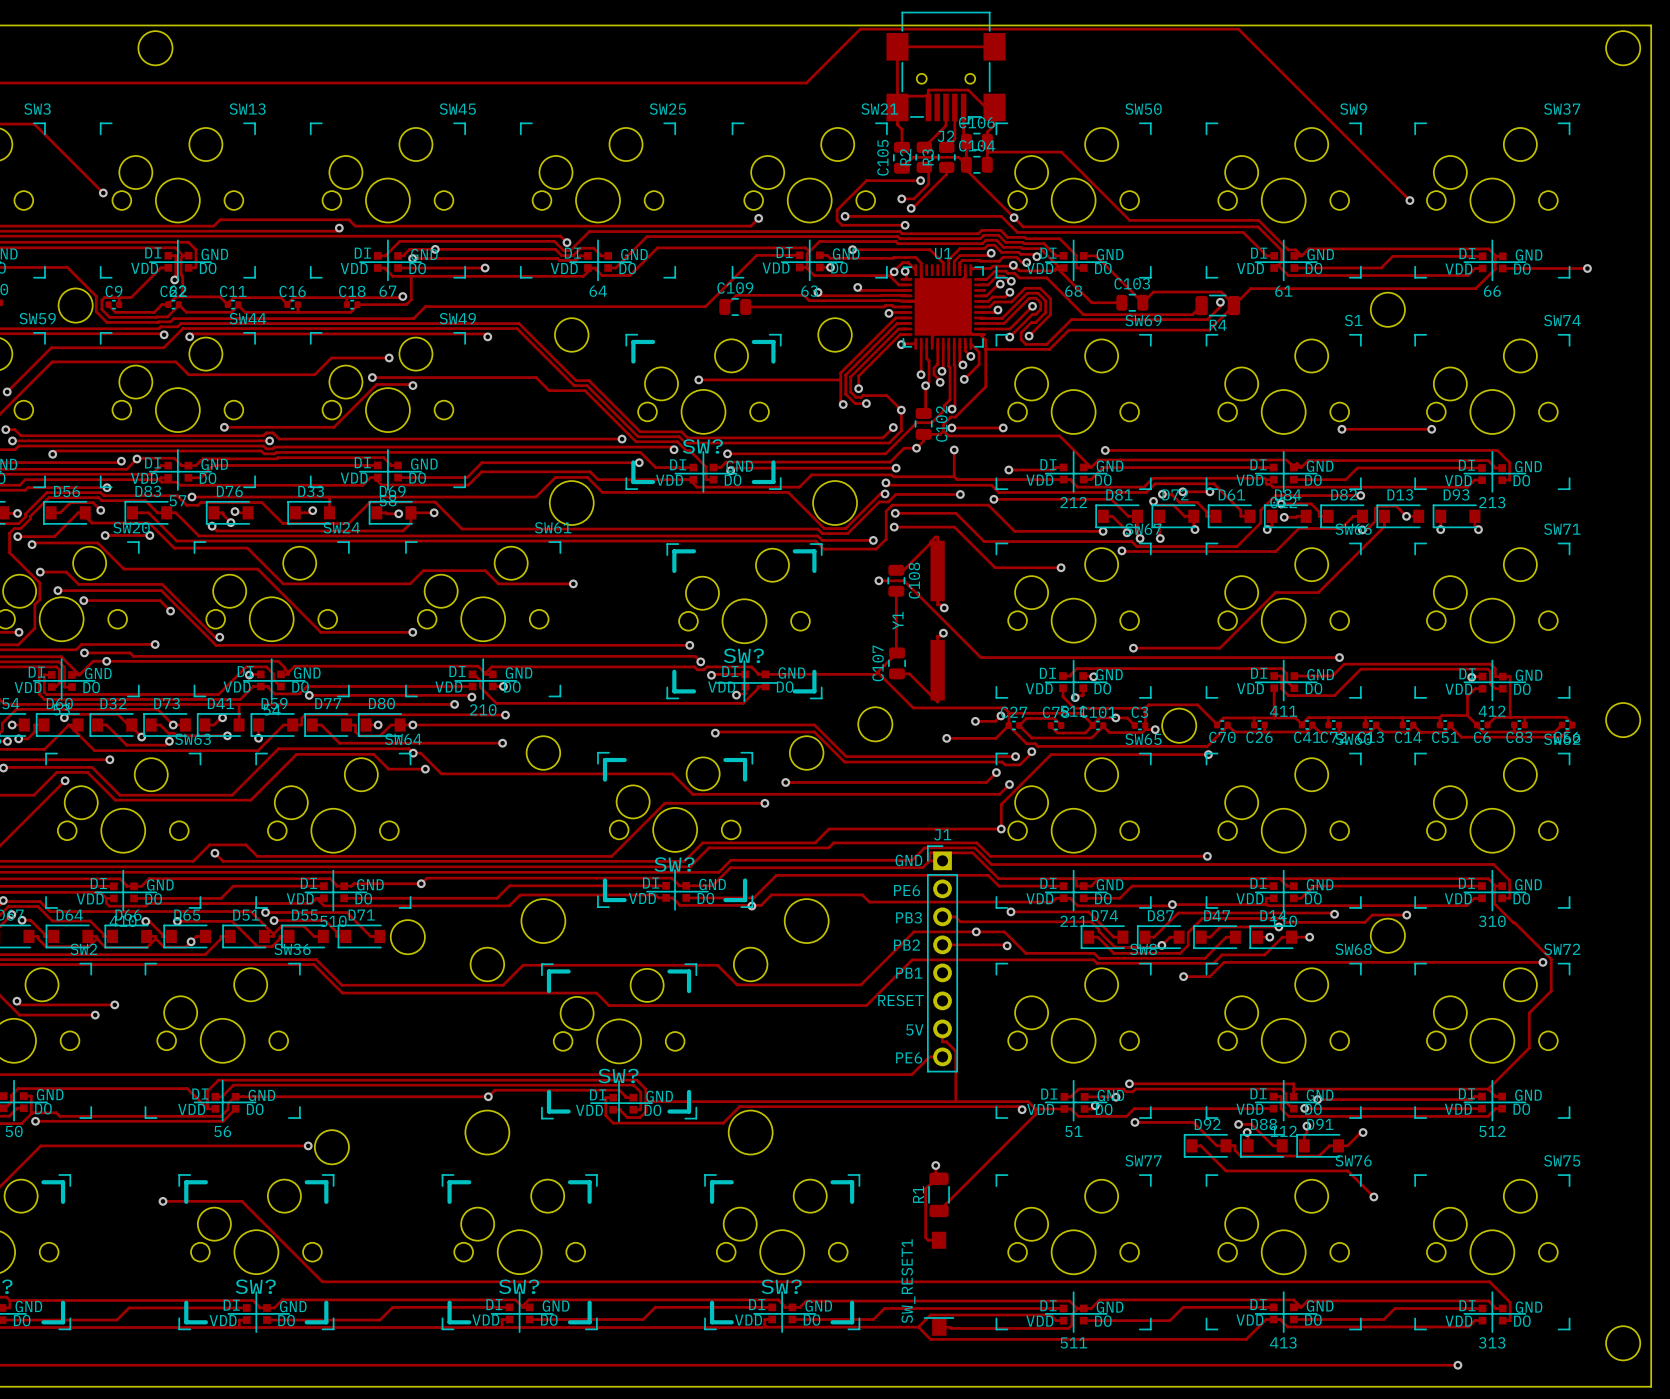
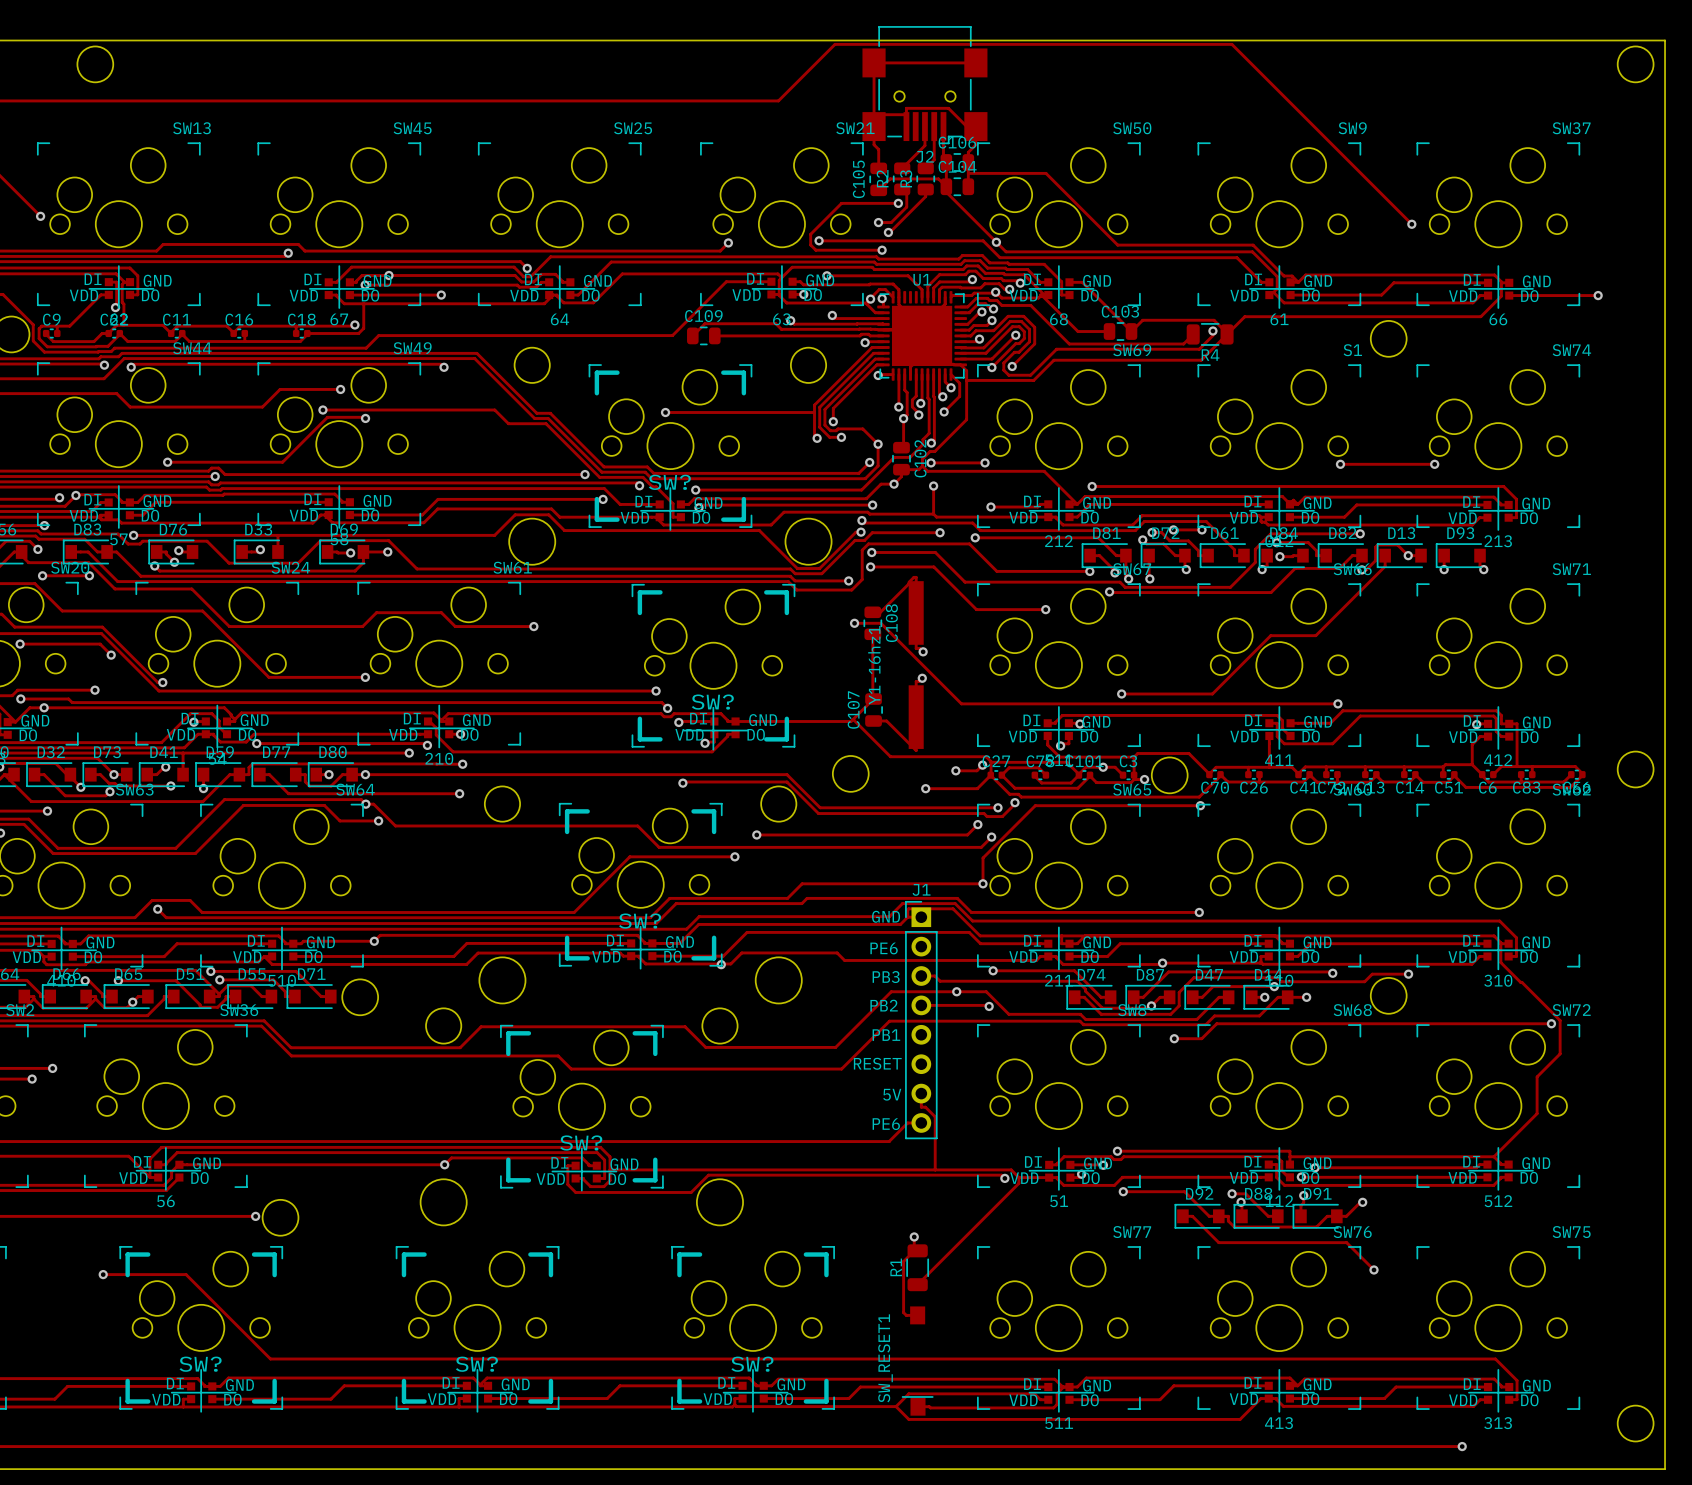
Y1 name: Y1 (898, 620) -> Y1-16hz1 (874, 665)

